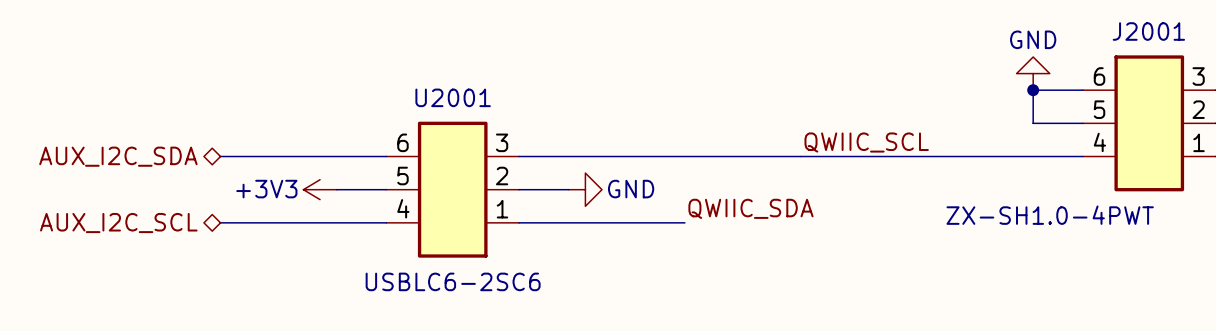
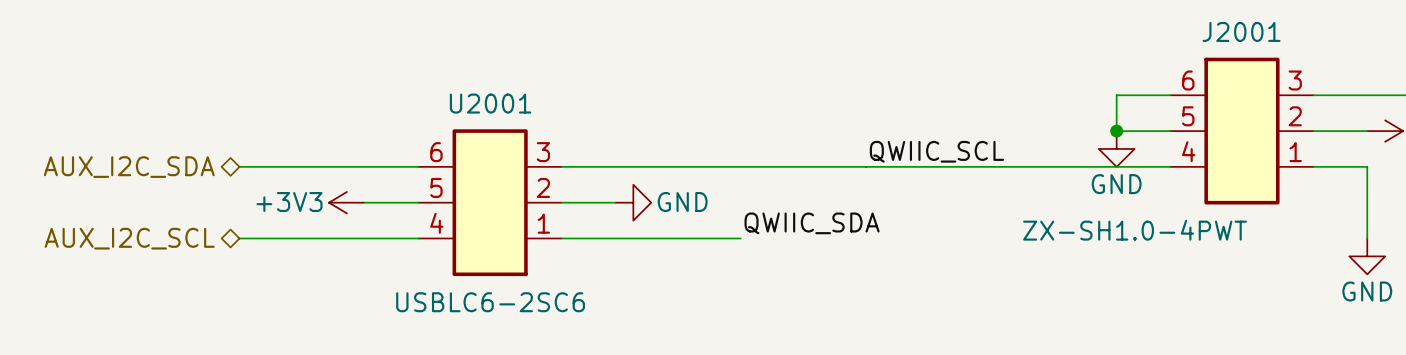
power symbol rotation: 0° (1033, 73) -> 180° (1116, 148)
power symbol position: GND (1033, 73) -> GND (1116, 148)
junction position: (1033, 90) -> (1116, 131)

